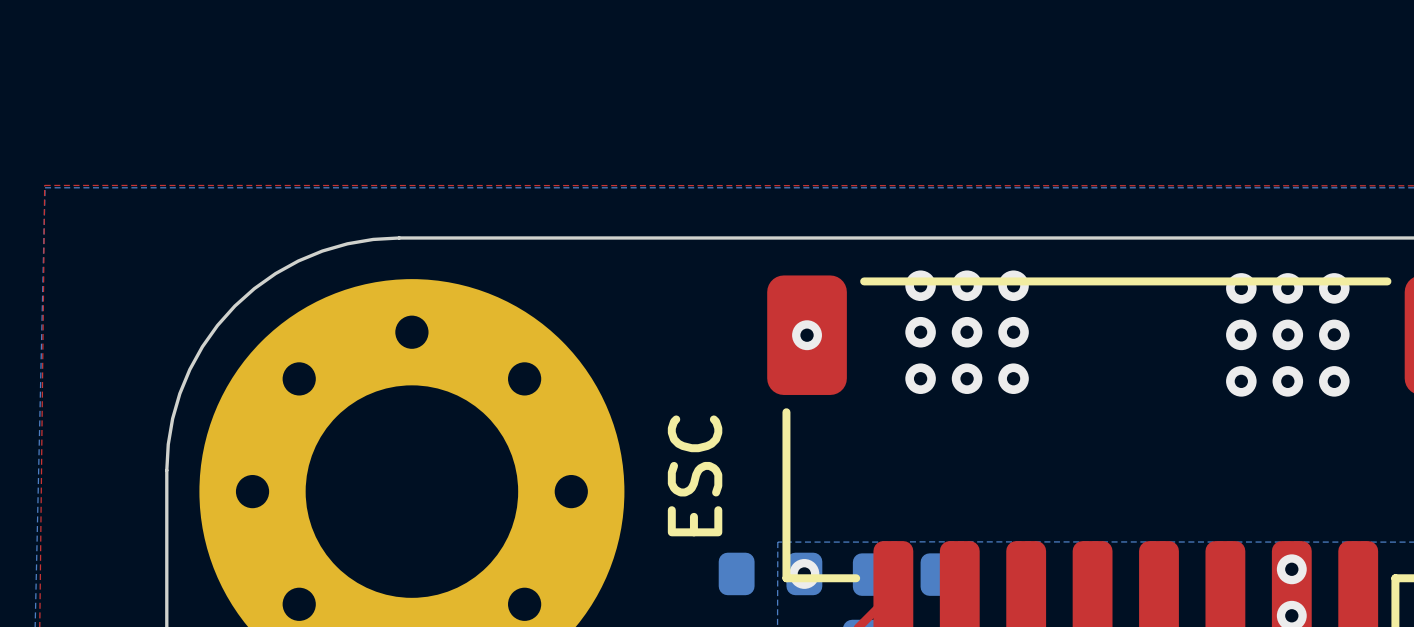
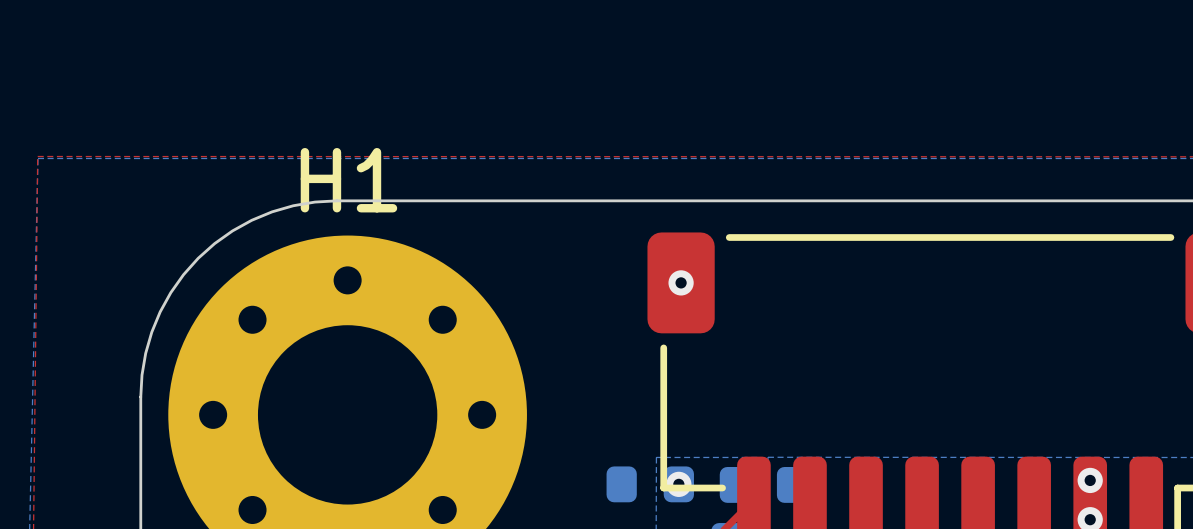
H1 name: none -> H1 (348, 180)
via: (920, 285) -> none
via: (967, 285) -> none
via: (1013, 285) -> none
via: (1241, 288) -> none
via: (1287, 288) -> none
via: (1334, 288) -> none
via: (920, 332) -> none
via: (967, 332) -> none
via: (1013, 332) -> none
via: (1241, 334) -> none
via: (1287, 334) -> none
via: (1334, 334) -> none
via: (920, 378) -> none
via: (967, 378) -> none
via: (1013, 378) -> none
via: (1241, 381) -> none
via: (1287, 381) -> none
via: (1334, 381) -> none
part value: ESC (695, 475) -> none

